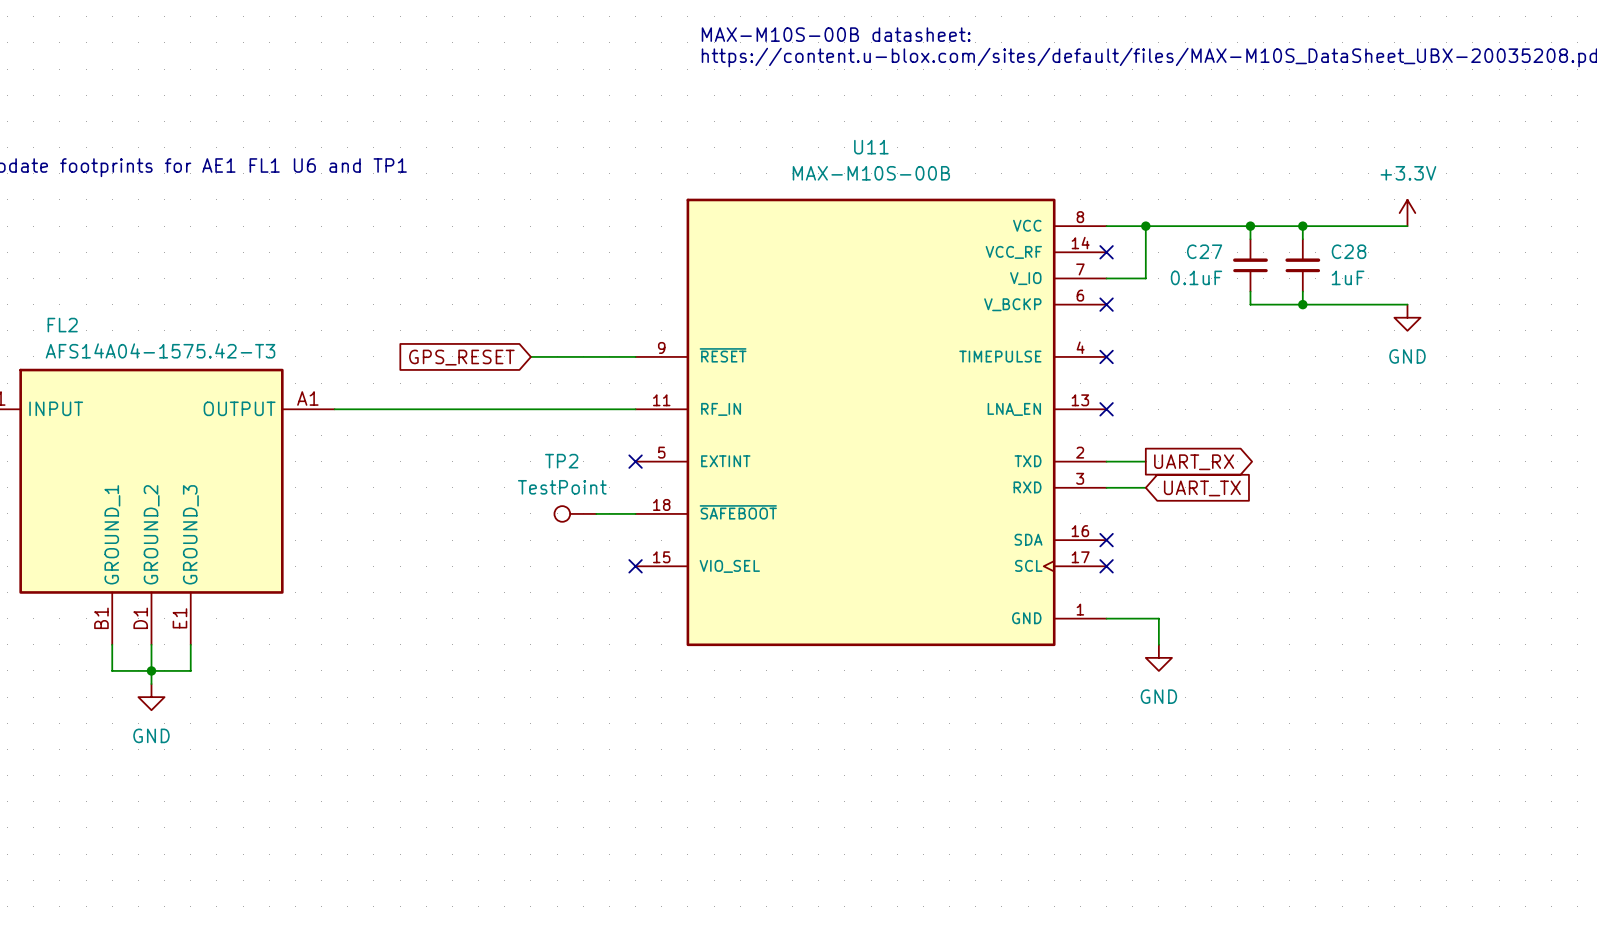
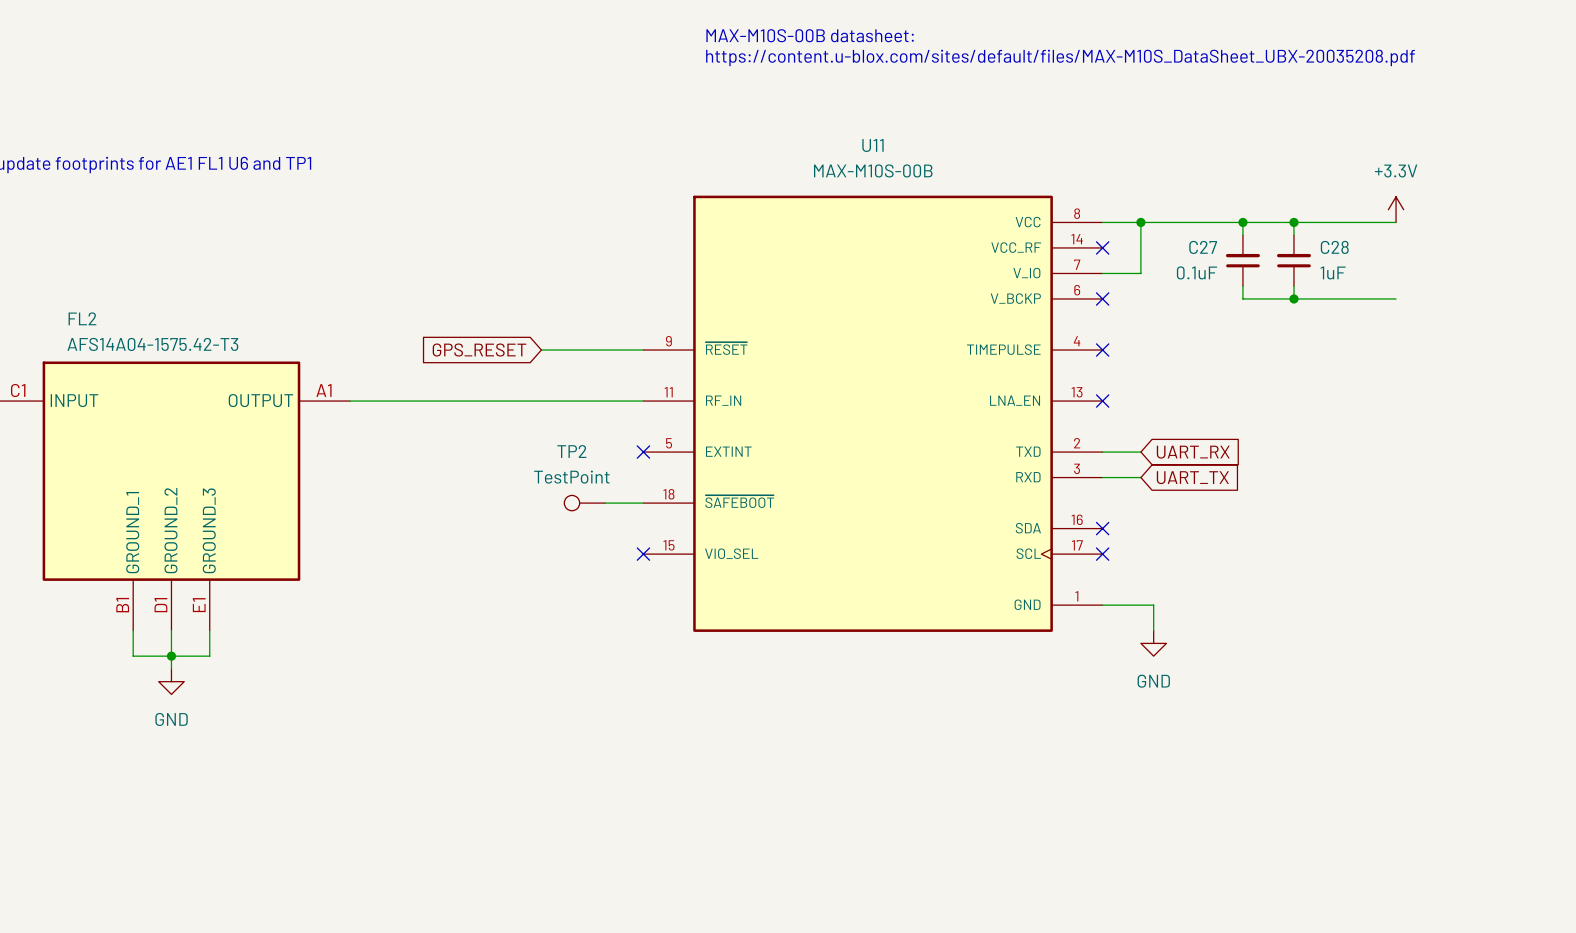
power symbol: GND (1407, 317) -> none
global label shape: output (1194, 462) -> input (1193, 452)

